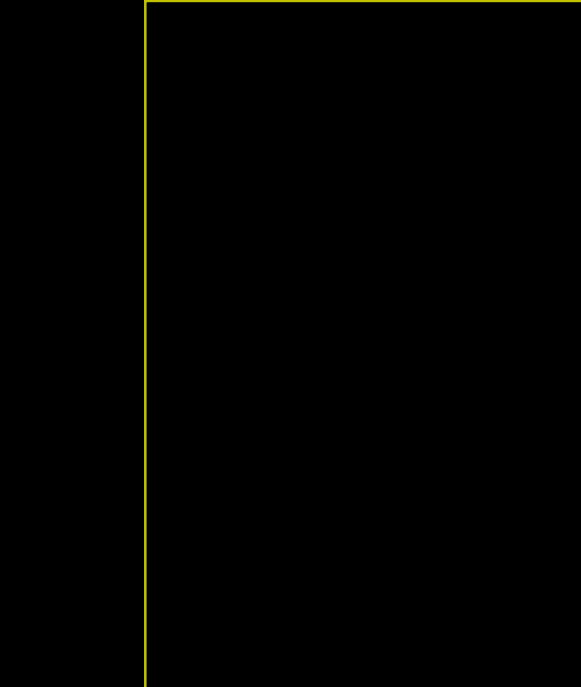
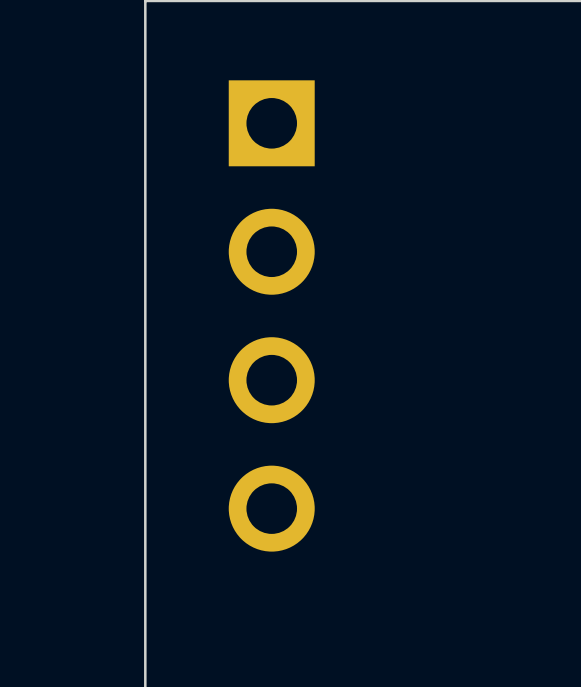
part: none -> (271, 315)

